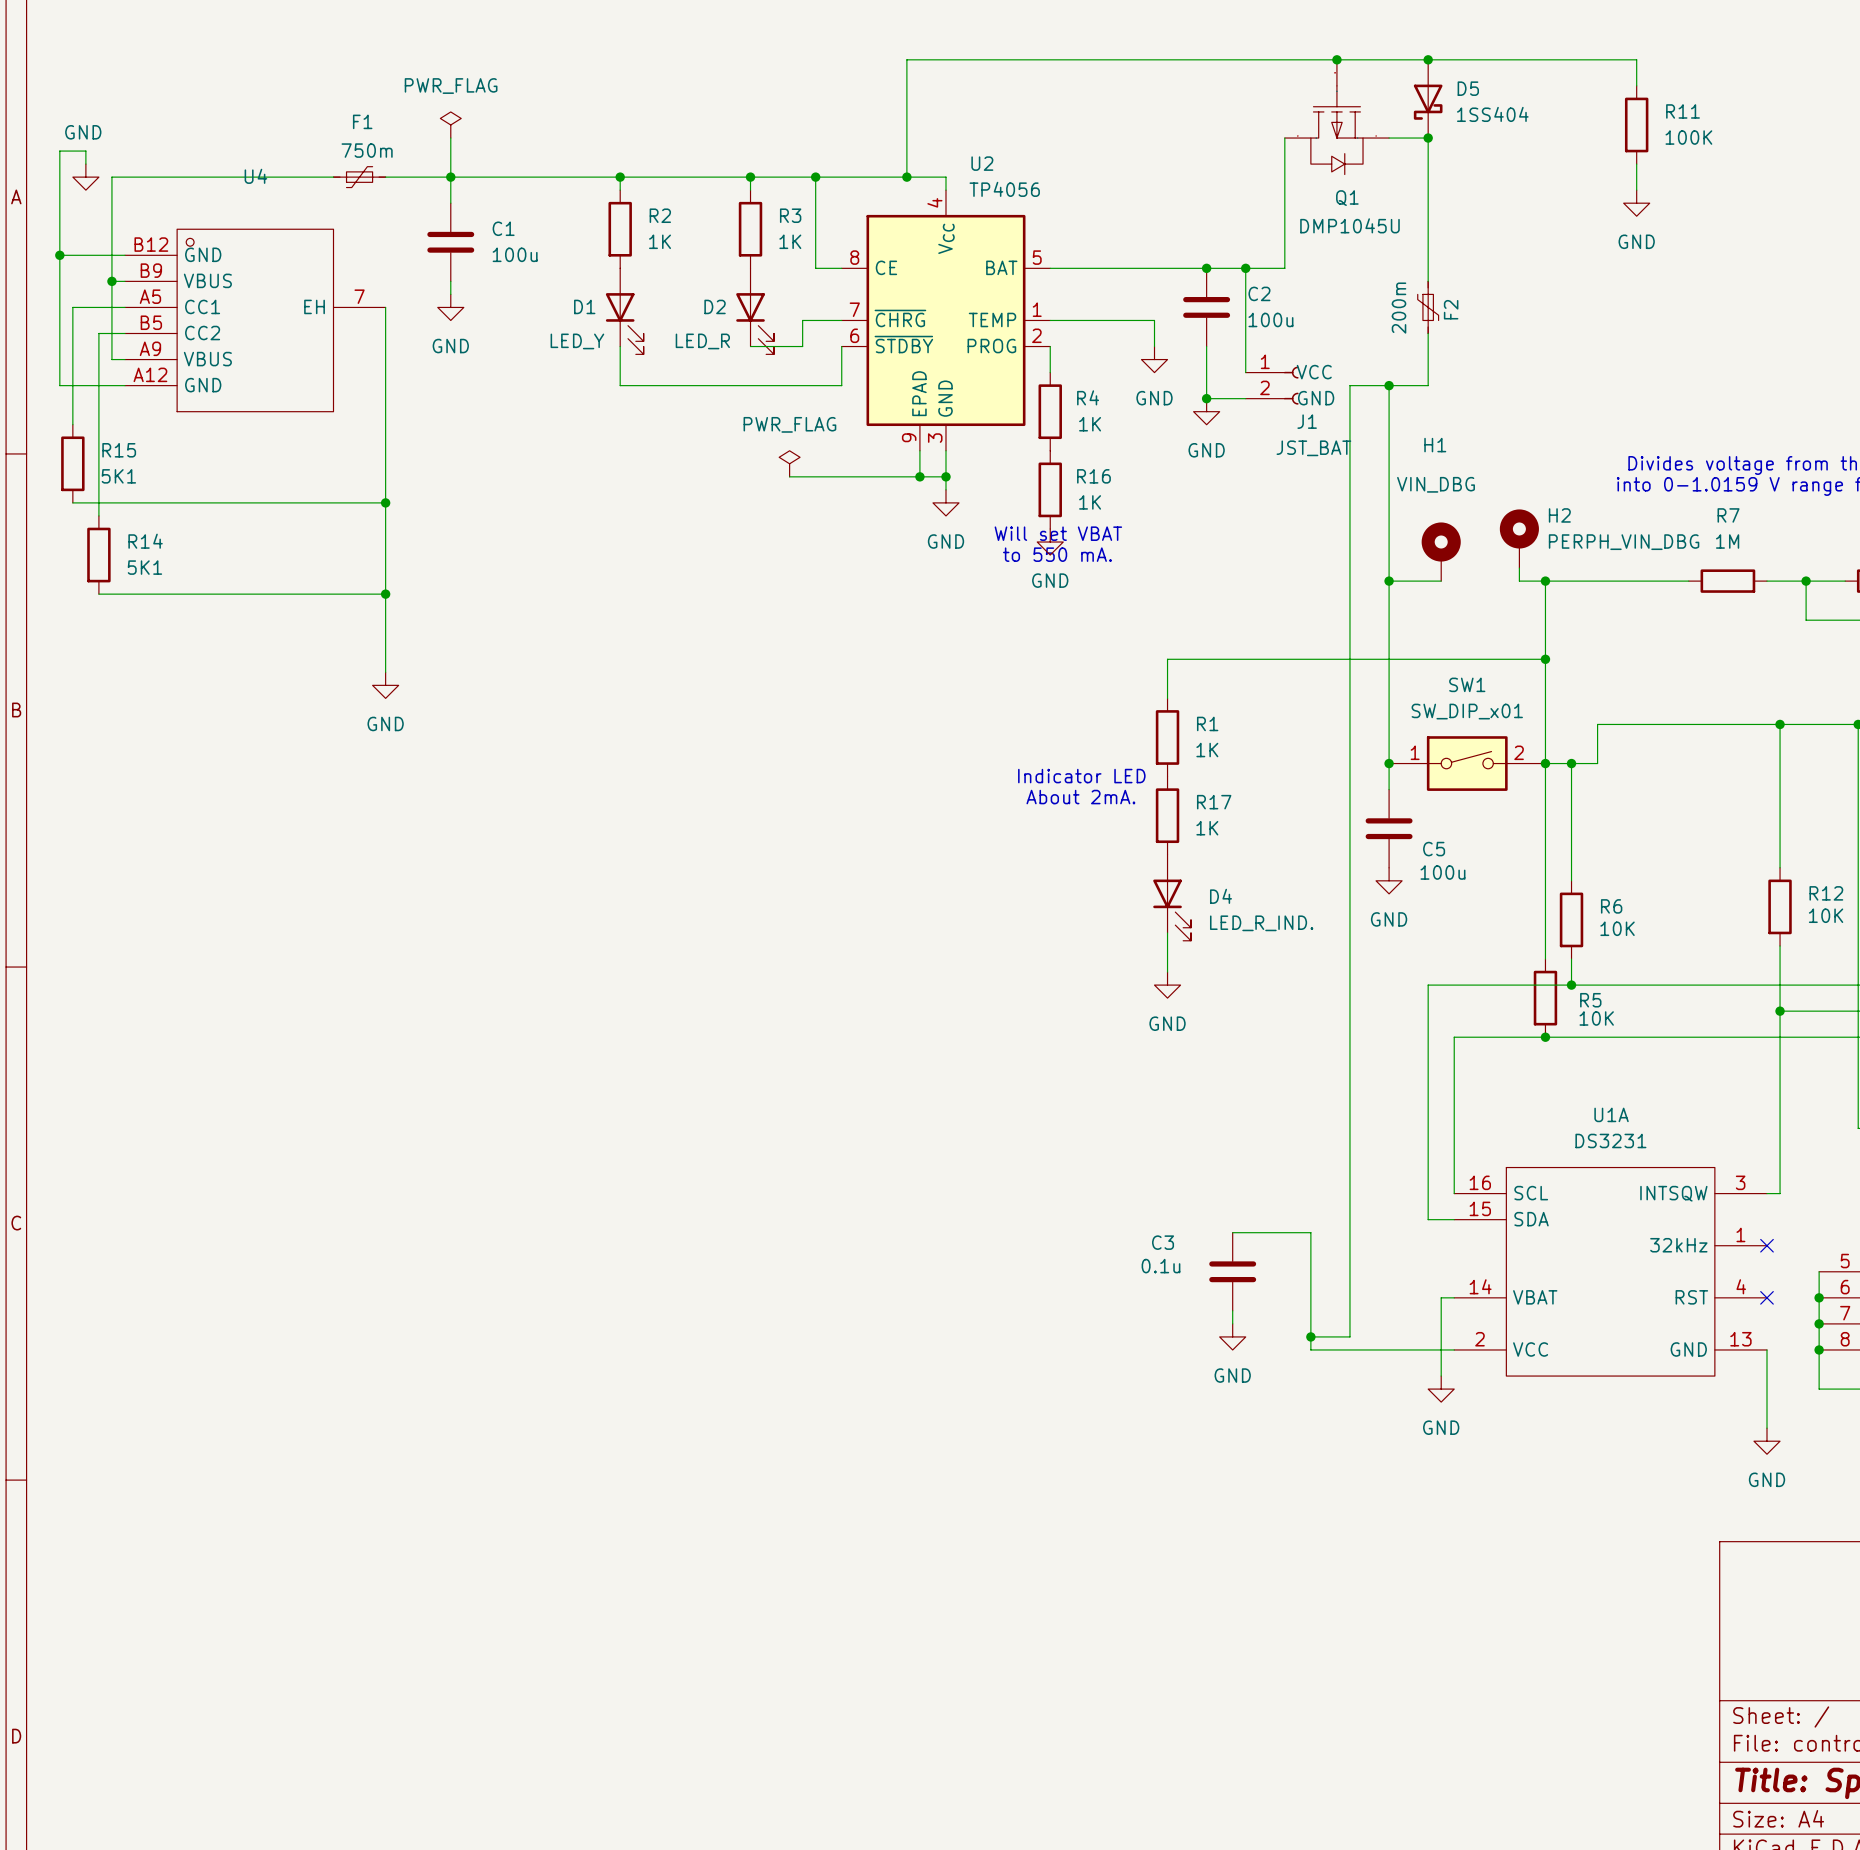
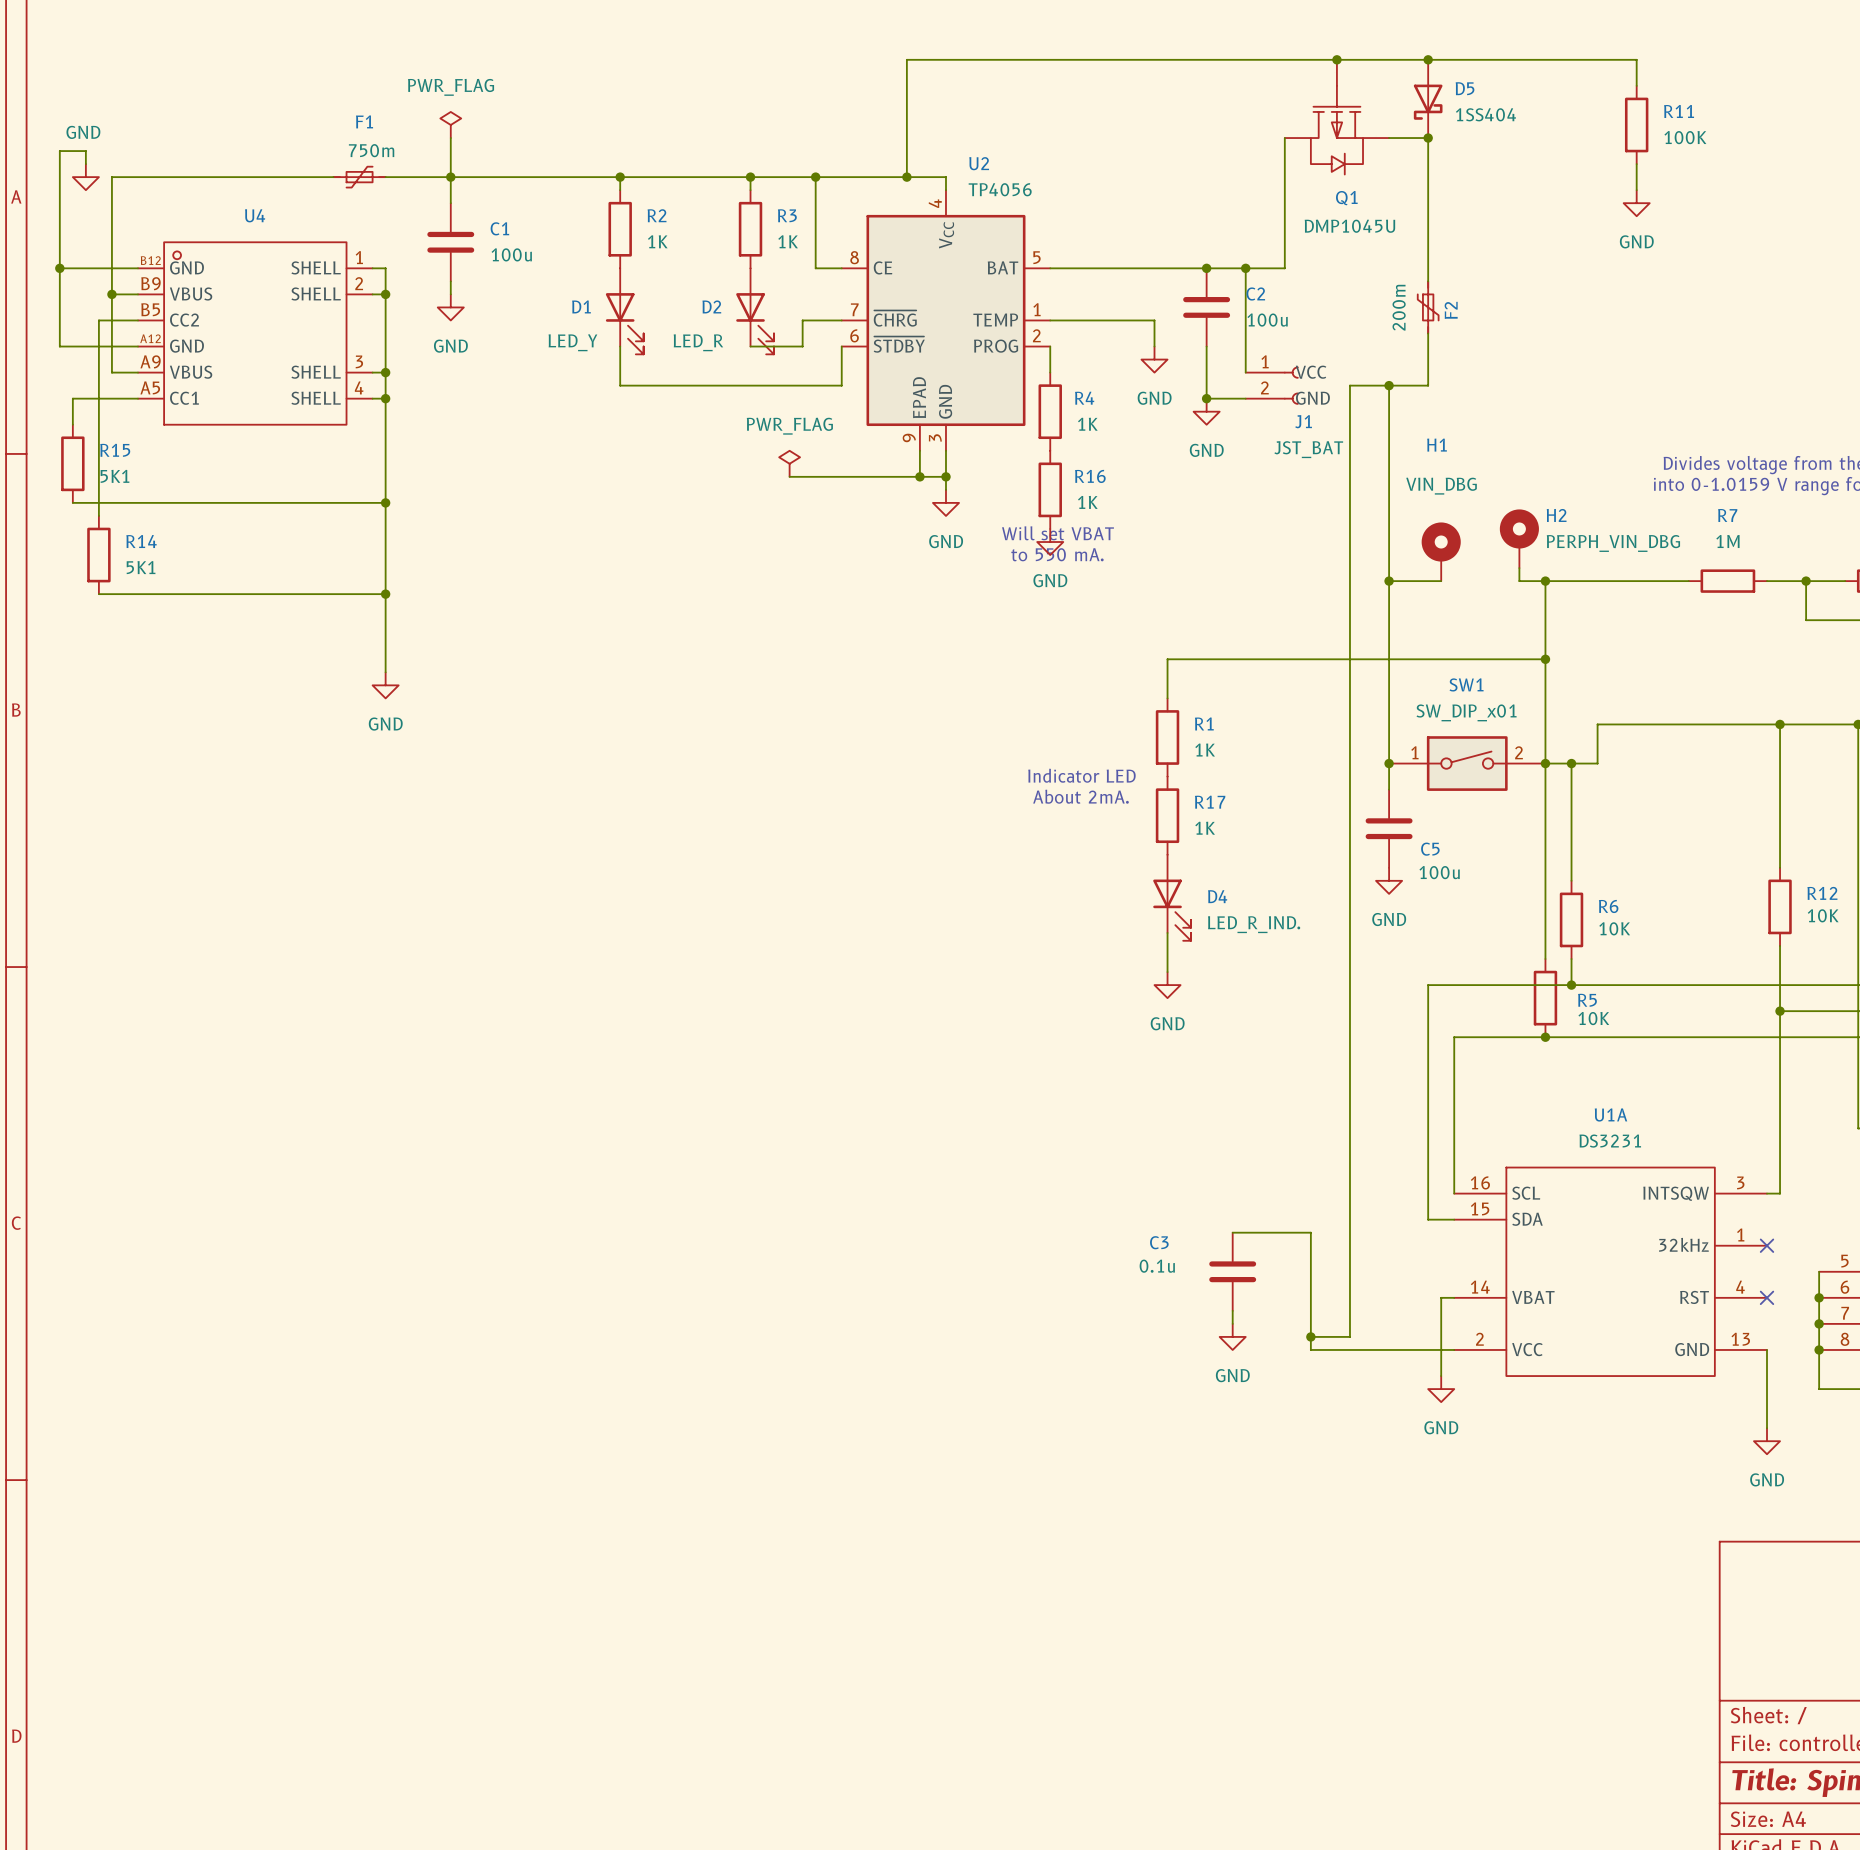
U4 name position: U4 (255, 176) -> U4 (255, 215)
U4 symbol: [124, 229, 386, 412] -> [138, 242, 373, 425]
wire: (59, 255) (124, 255) -> none
junction position: (59, 255) -> (59, 268)
wire: none -> (59, 268) (138, 268)
wire: none -> (372, 268) (385, 268) (385, 307)
wire: (111, 281) (124, 281) -> none
junction position: (111, 281) -> (111, 294)
wire: none -> (111, 294) (138, 294)
wire: none -> (372, 294) (385, 294)
junction: none -> (385, 294)
wire: (124, 307) (72, 307) (72, 398) -> (138, 398) (72, 398)
wire: (98, 333) (124, 333) -> (98, 333) (98, 320) (138, 320)
wire: (59, 346) (59, 385) (124, 385) -> (59, 346) (138, 346)
wire: (111, 359) (124, 359) -> (111, 359) (111, 372) (138, 372)
wire: none -> (372, 372) (385, 372)
junction: none -> (385, 372)
wire: none -> (372, 398) (385, 398)
junction: none -> (385, 398)

